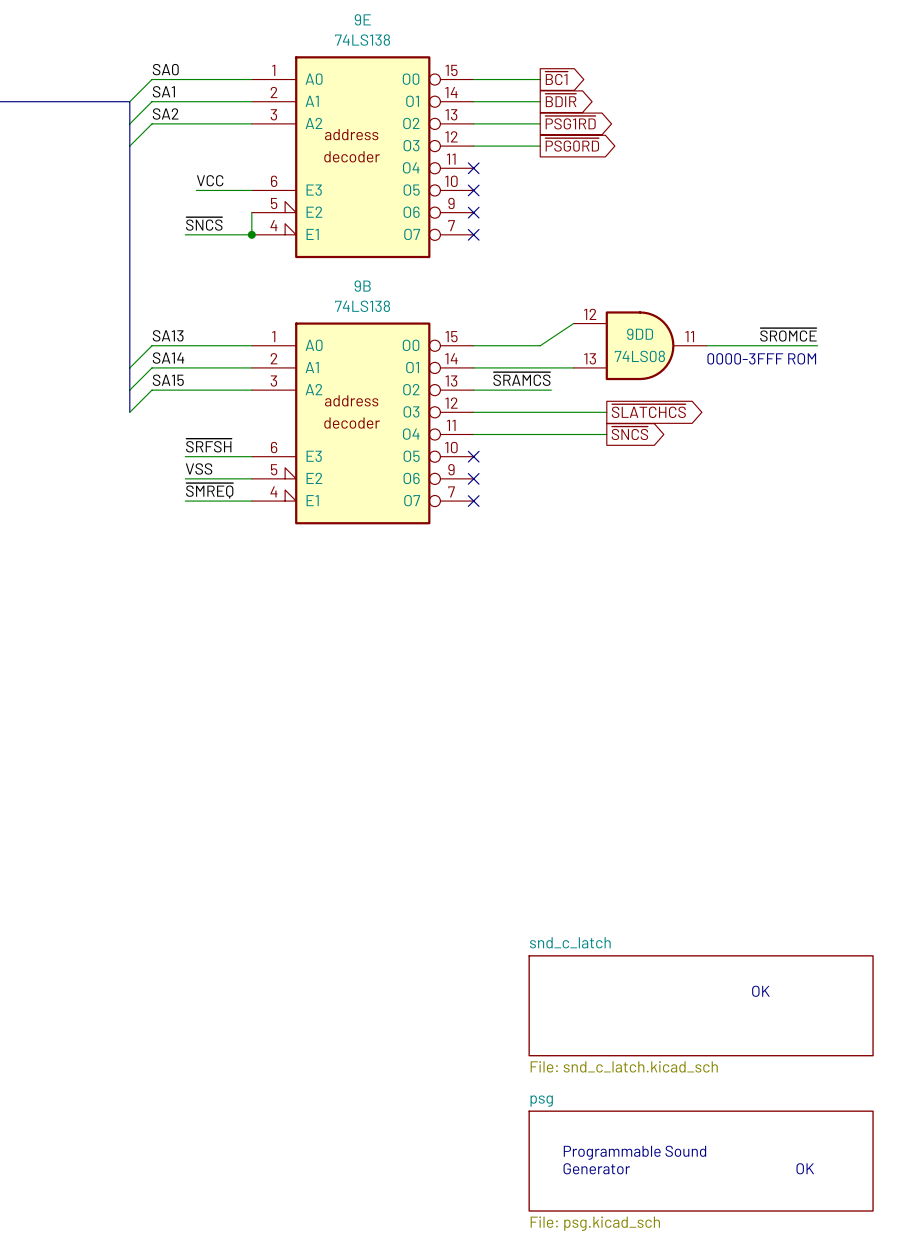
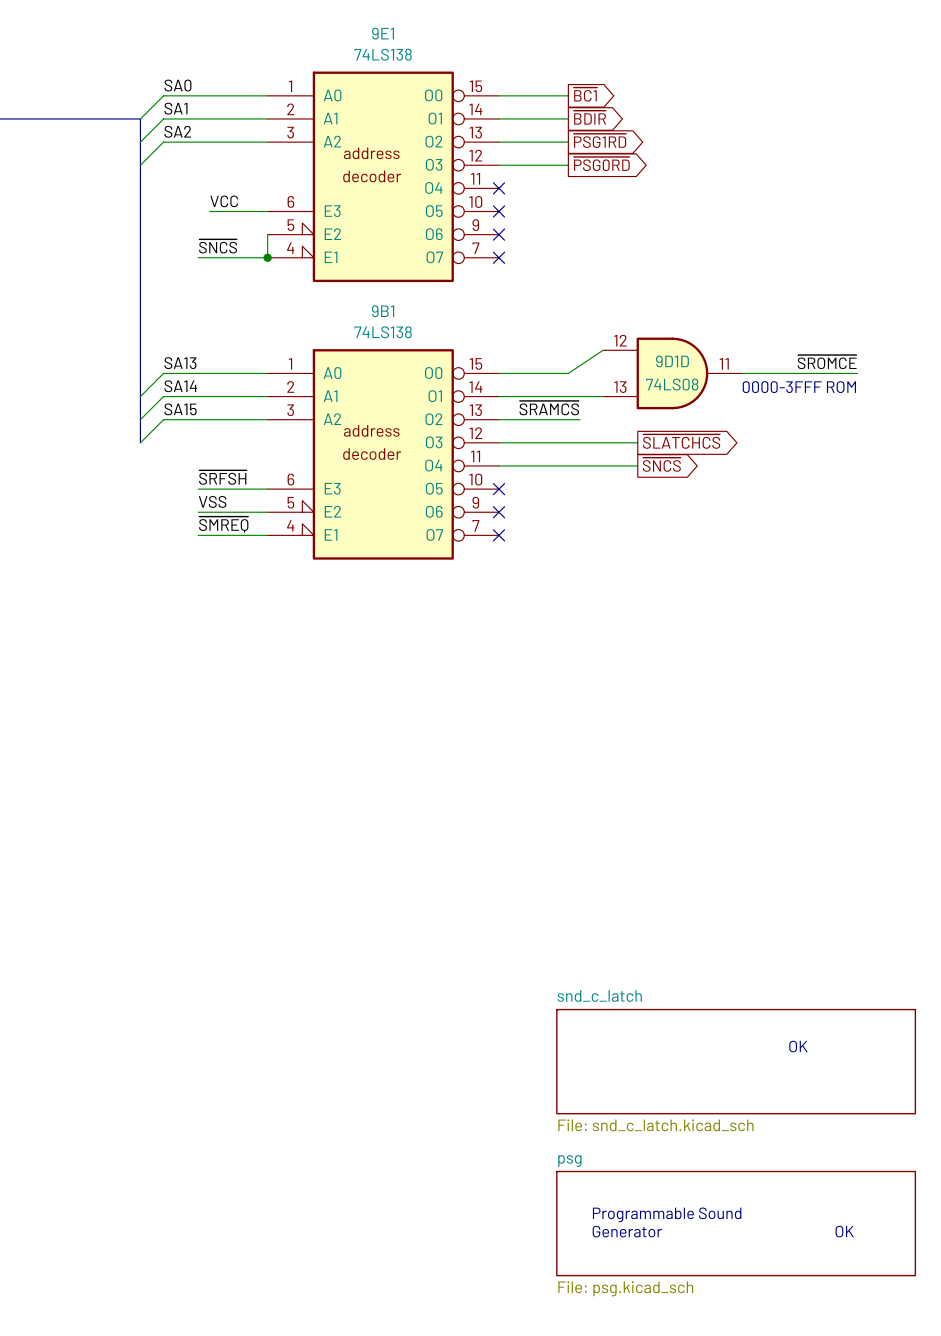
9E name: 9E (362, 19) -> 9E1 (383, 33)
9B name: 9B (362, 286) -> 9B1 (383, 311)
9DD name: 9DD (640, 334) -> 9D1D (672, 361)

